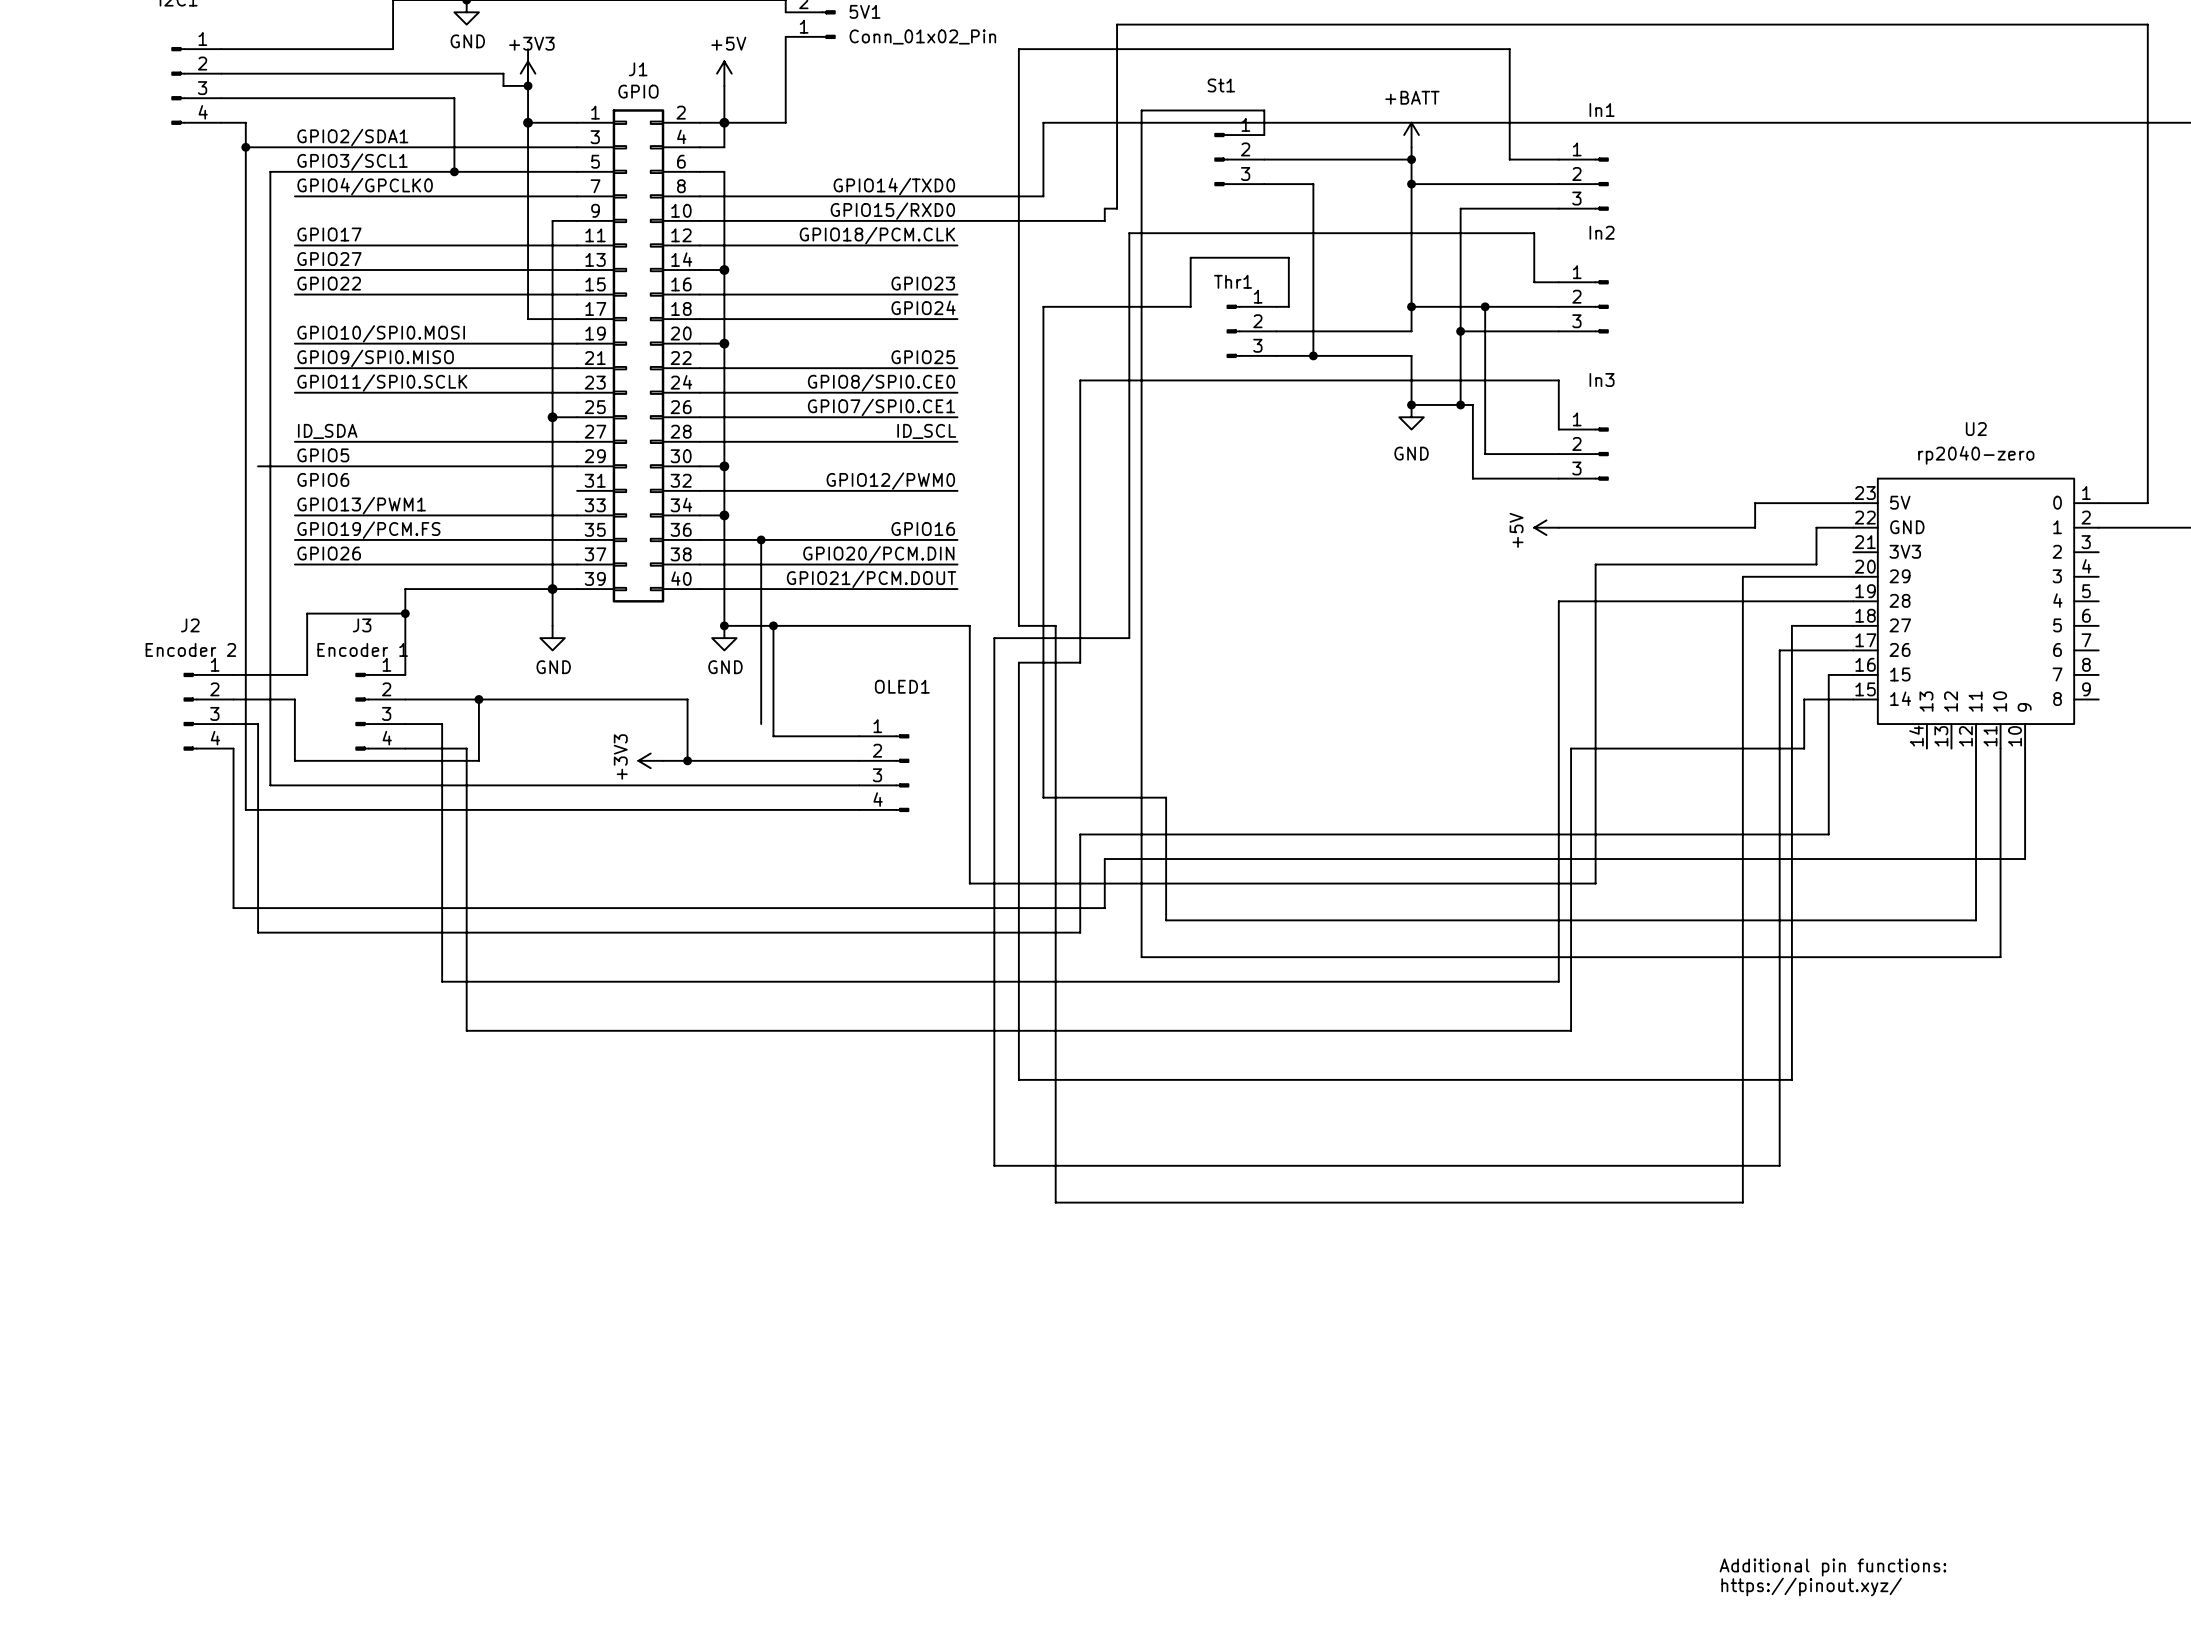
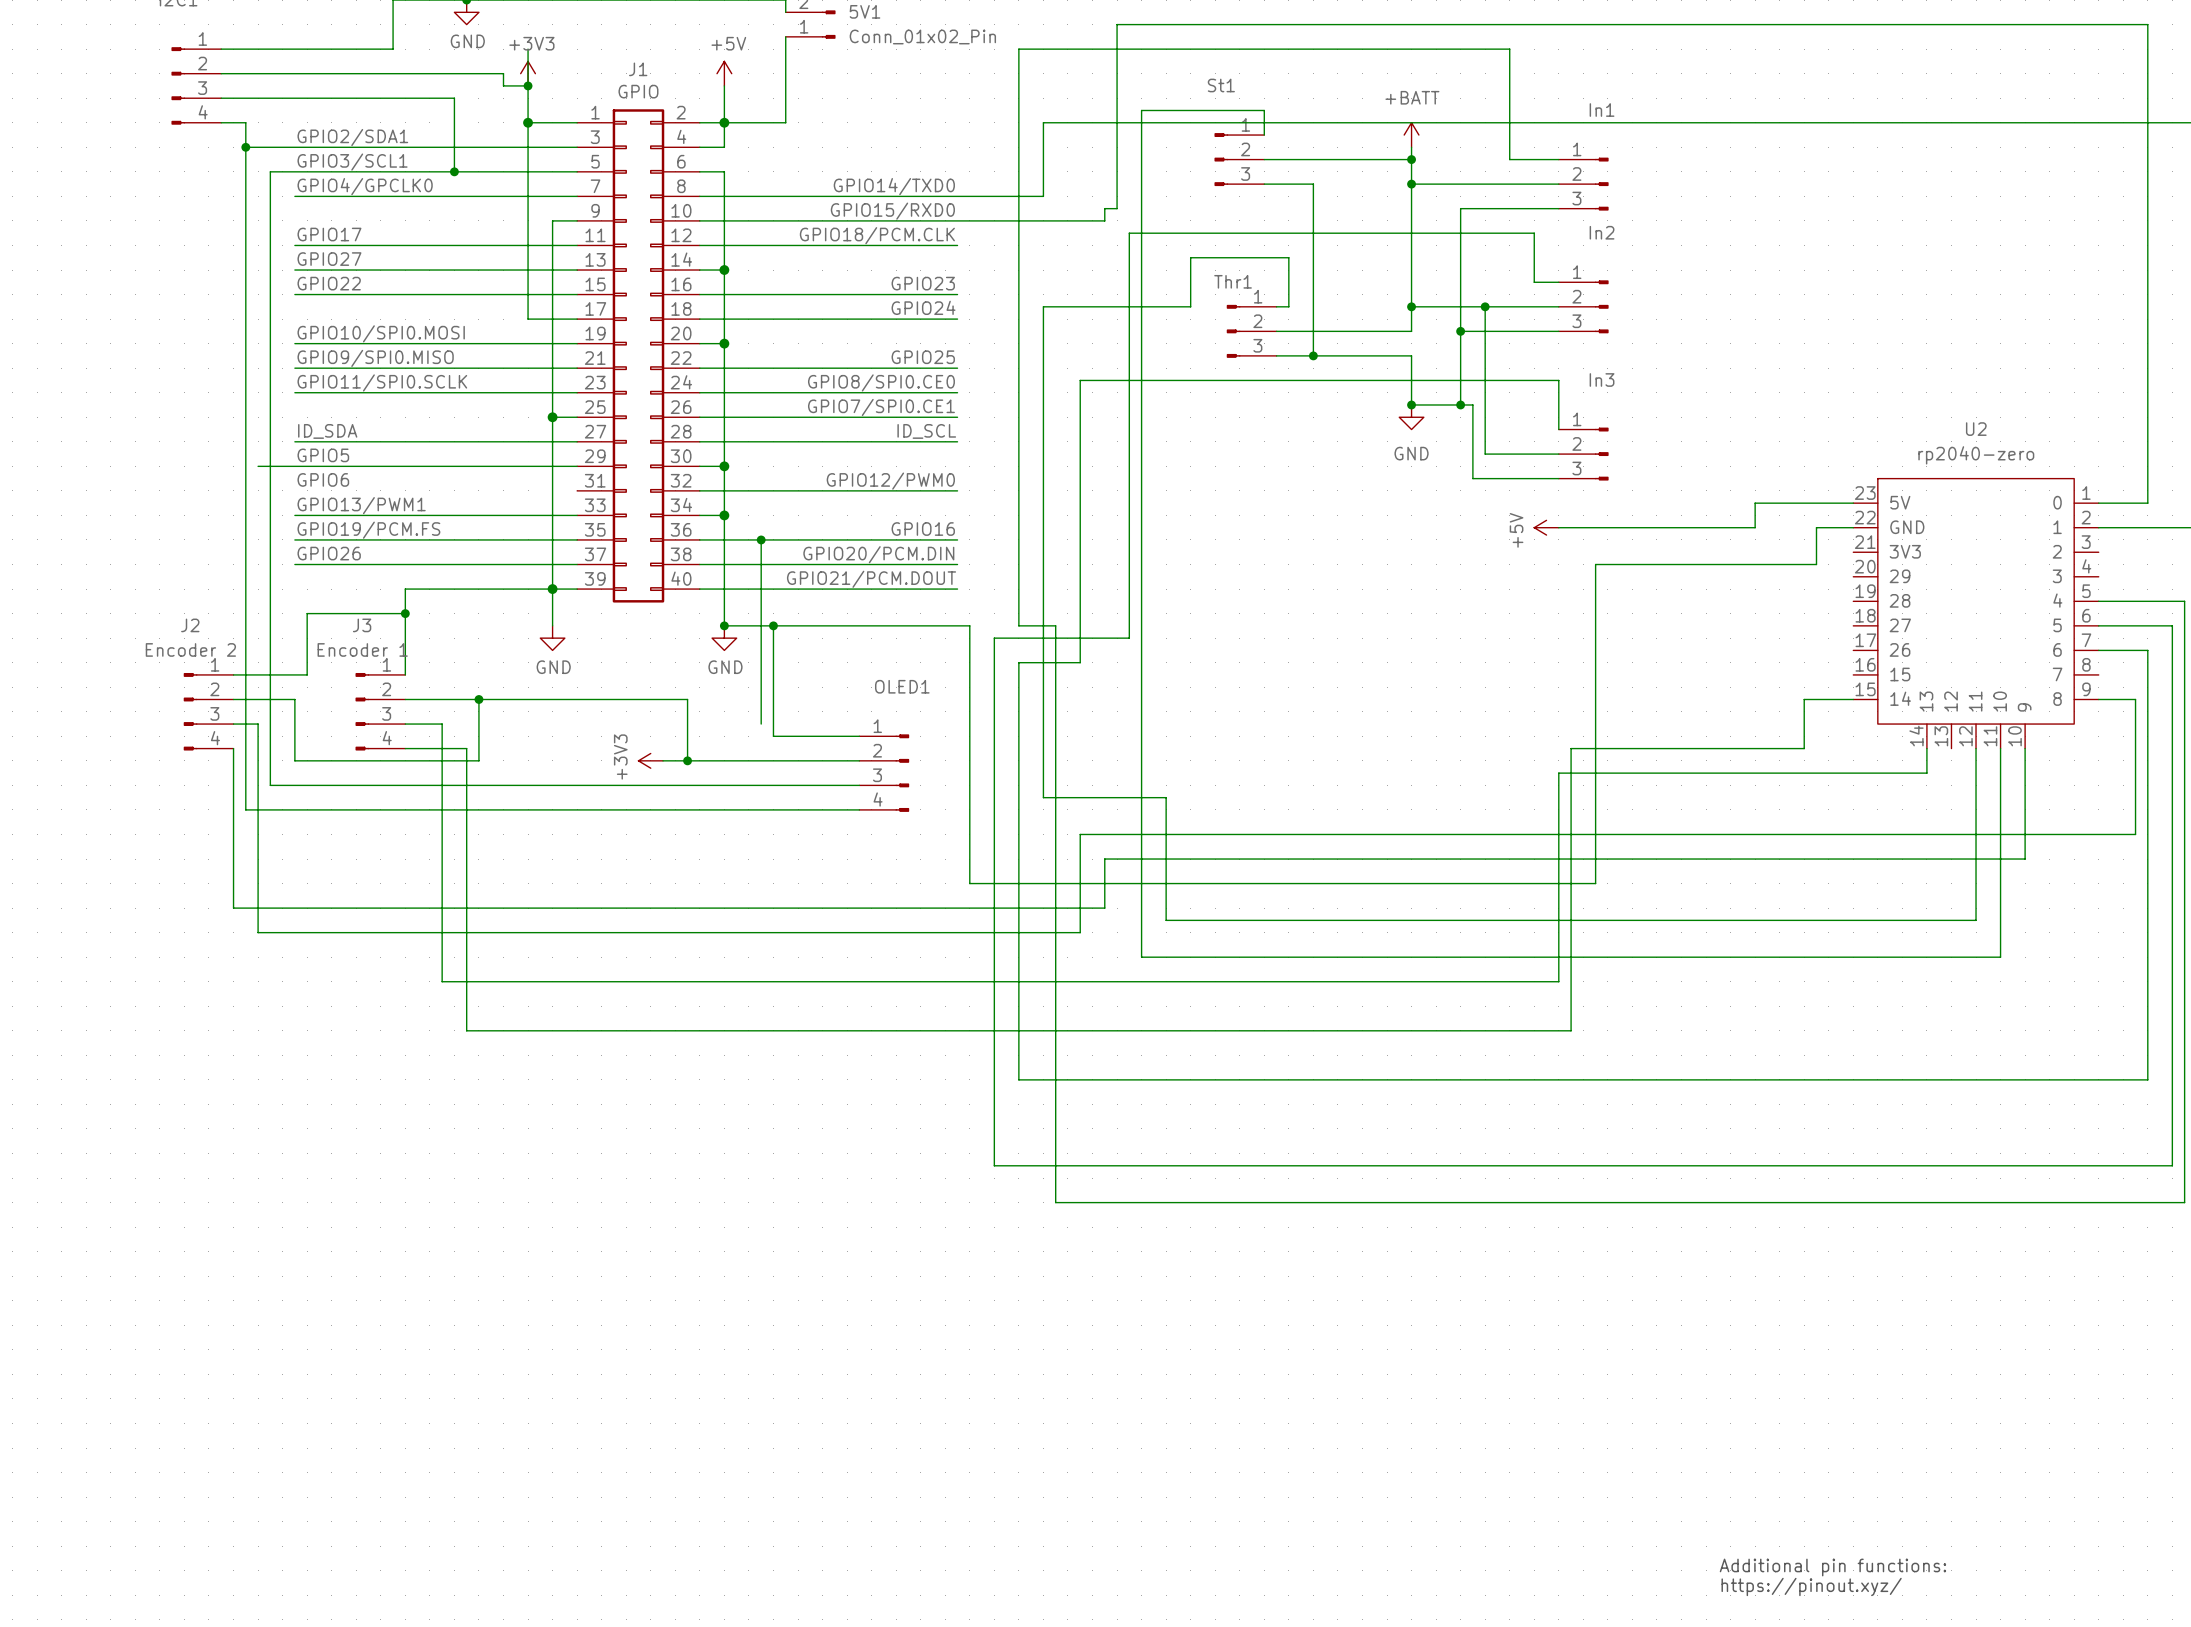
wire: (1853, 576) (1742, 576) (1742, 1202) -> (2098, 601) (2184, 601) (2184, 1202) (1742, 1202)
wire: (1853, 601) (1558, 601) (1558, 773) -> (1926, 748) (1926, 773) (1558, 773)
wire: (1853, 625) (1791, 625) (1791, 1079) -> (2098, 650) (2147, 650) (2147, 1079) (1791, 1079)
wire: (1853, 650) (1779, 650) (1779, 1165) -> (2098, 625) (2172, 625) (2172, 1165) (1779, 1165)
wire: (1853, 674) (1828, 674) (1828, 834) -> (2098, 699) (2135, 699) (2135, 834) (1828, 834)

